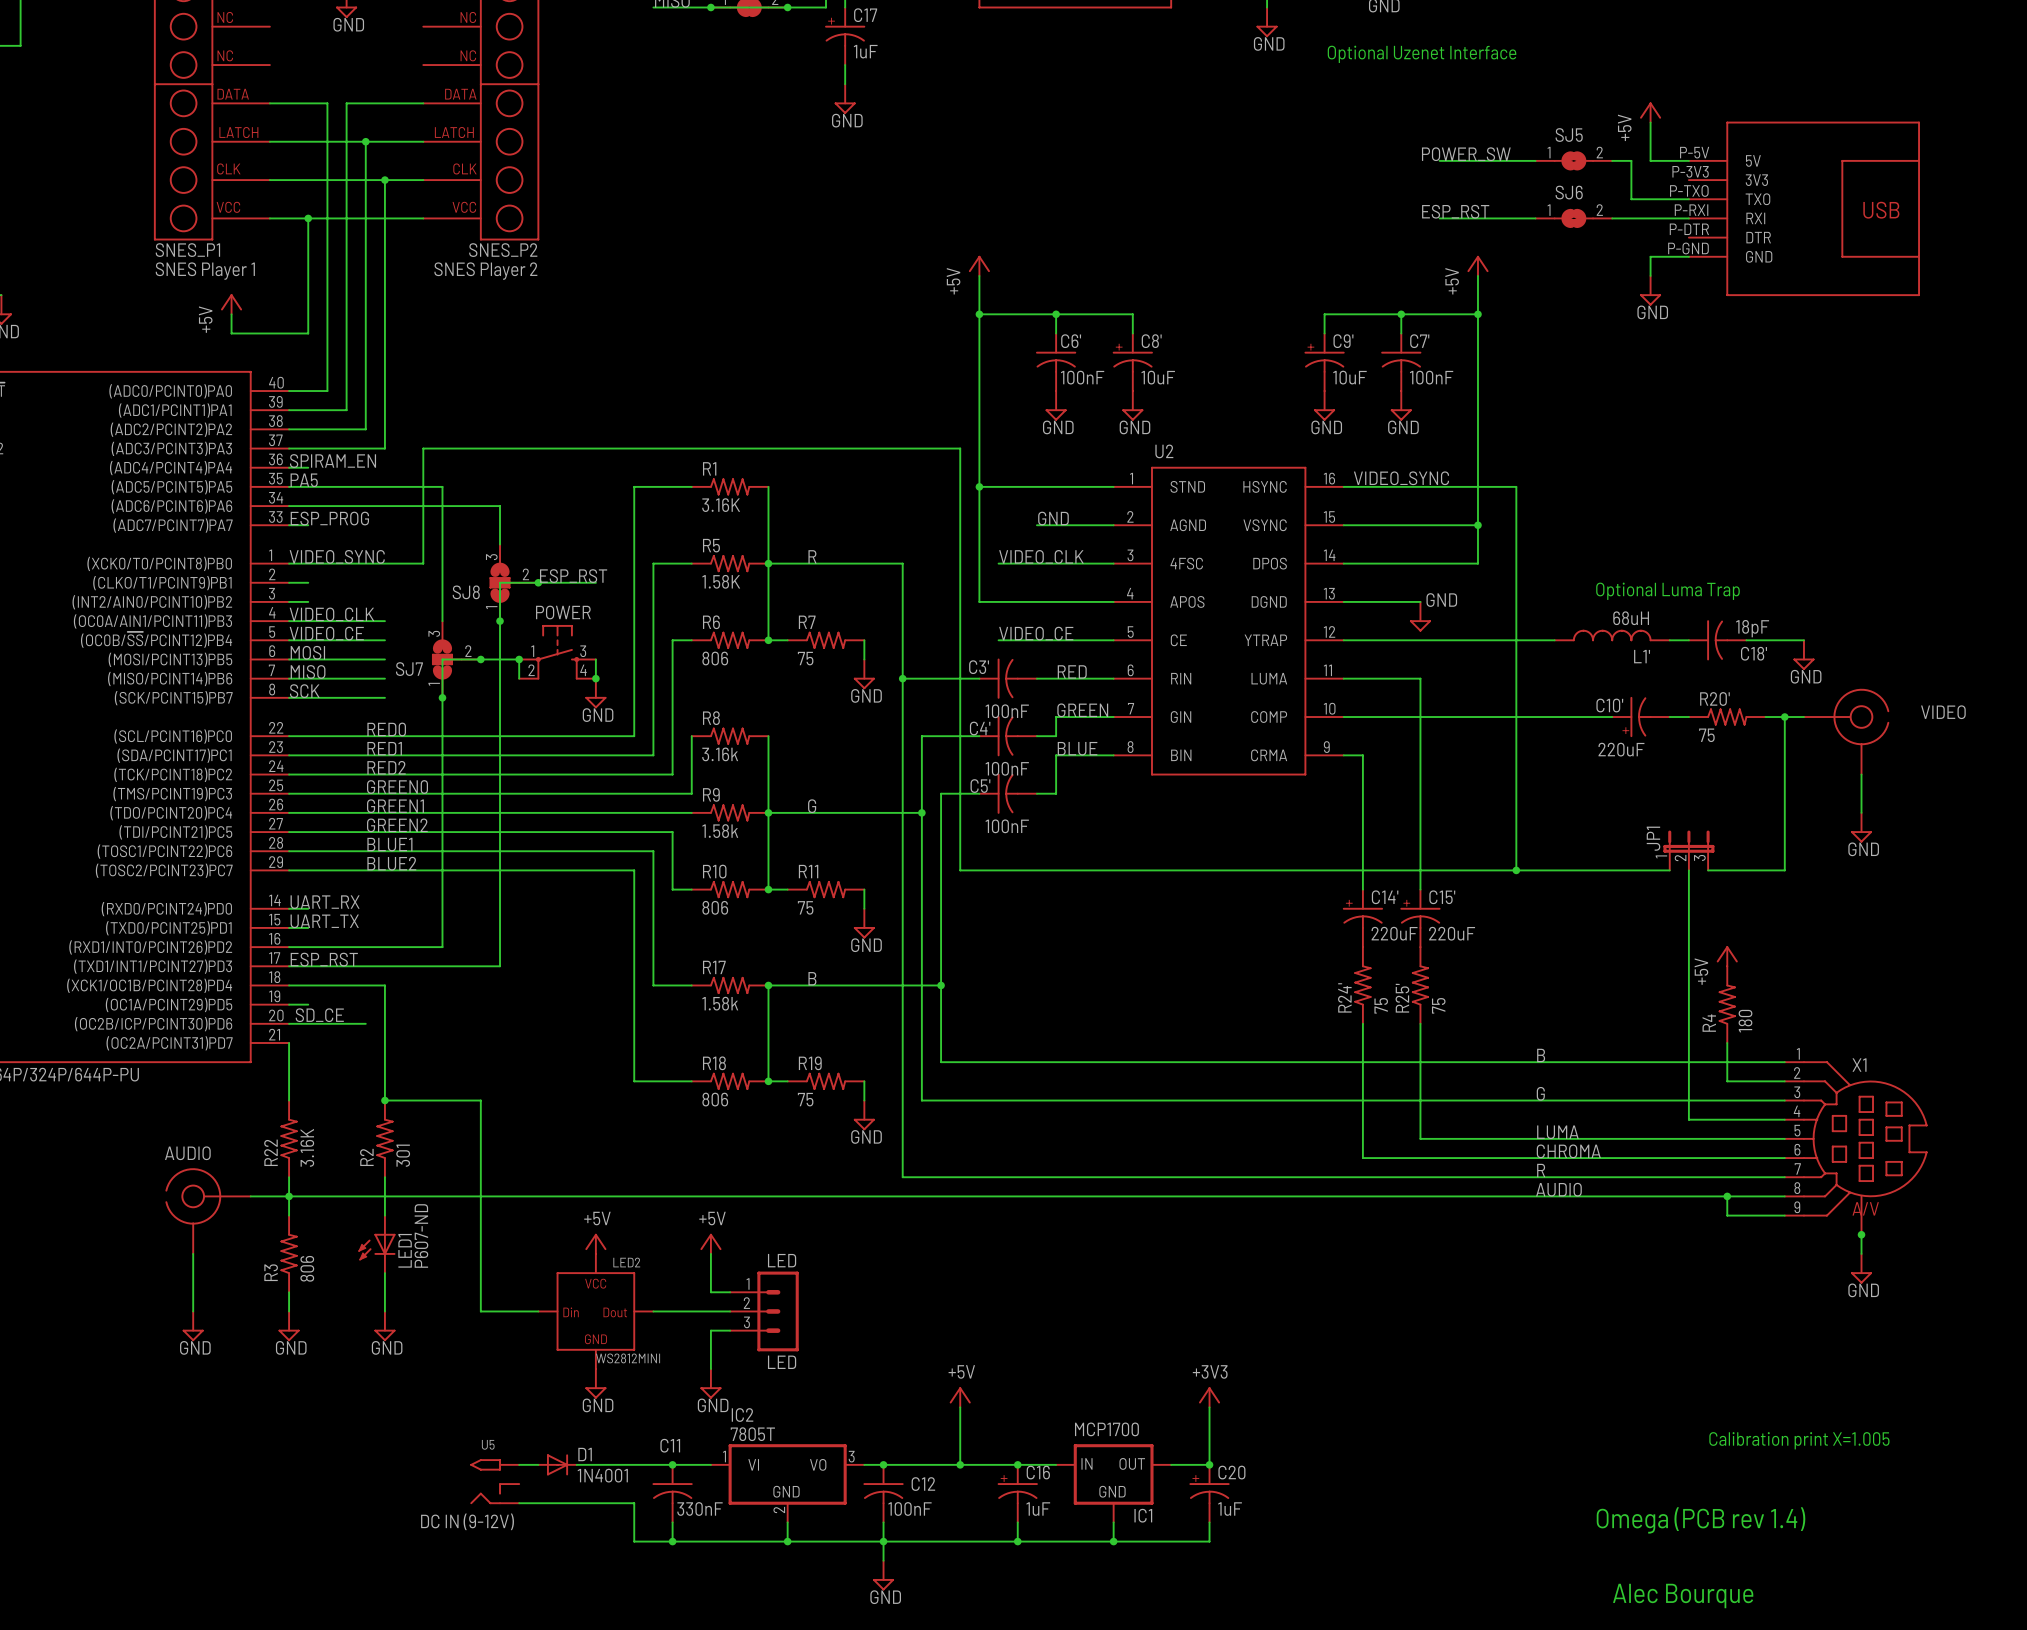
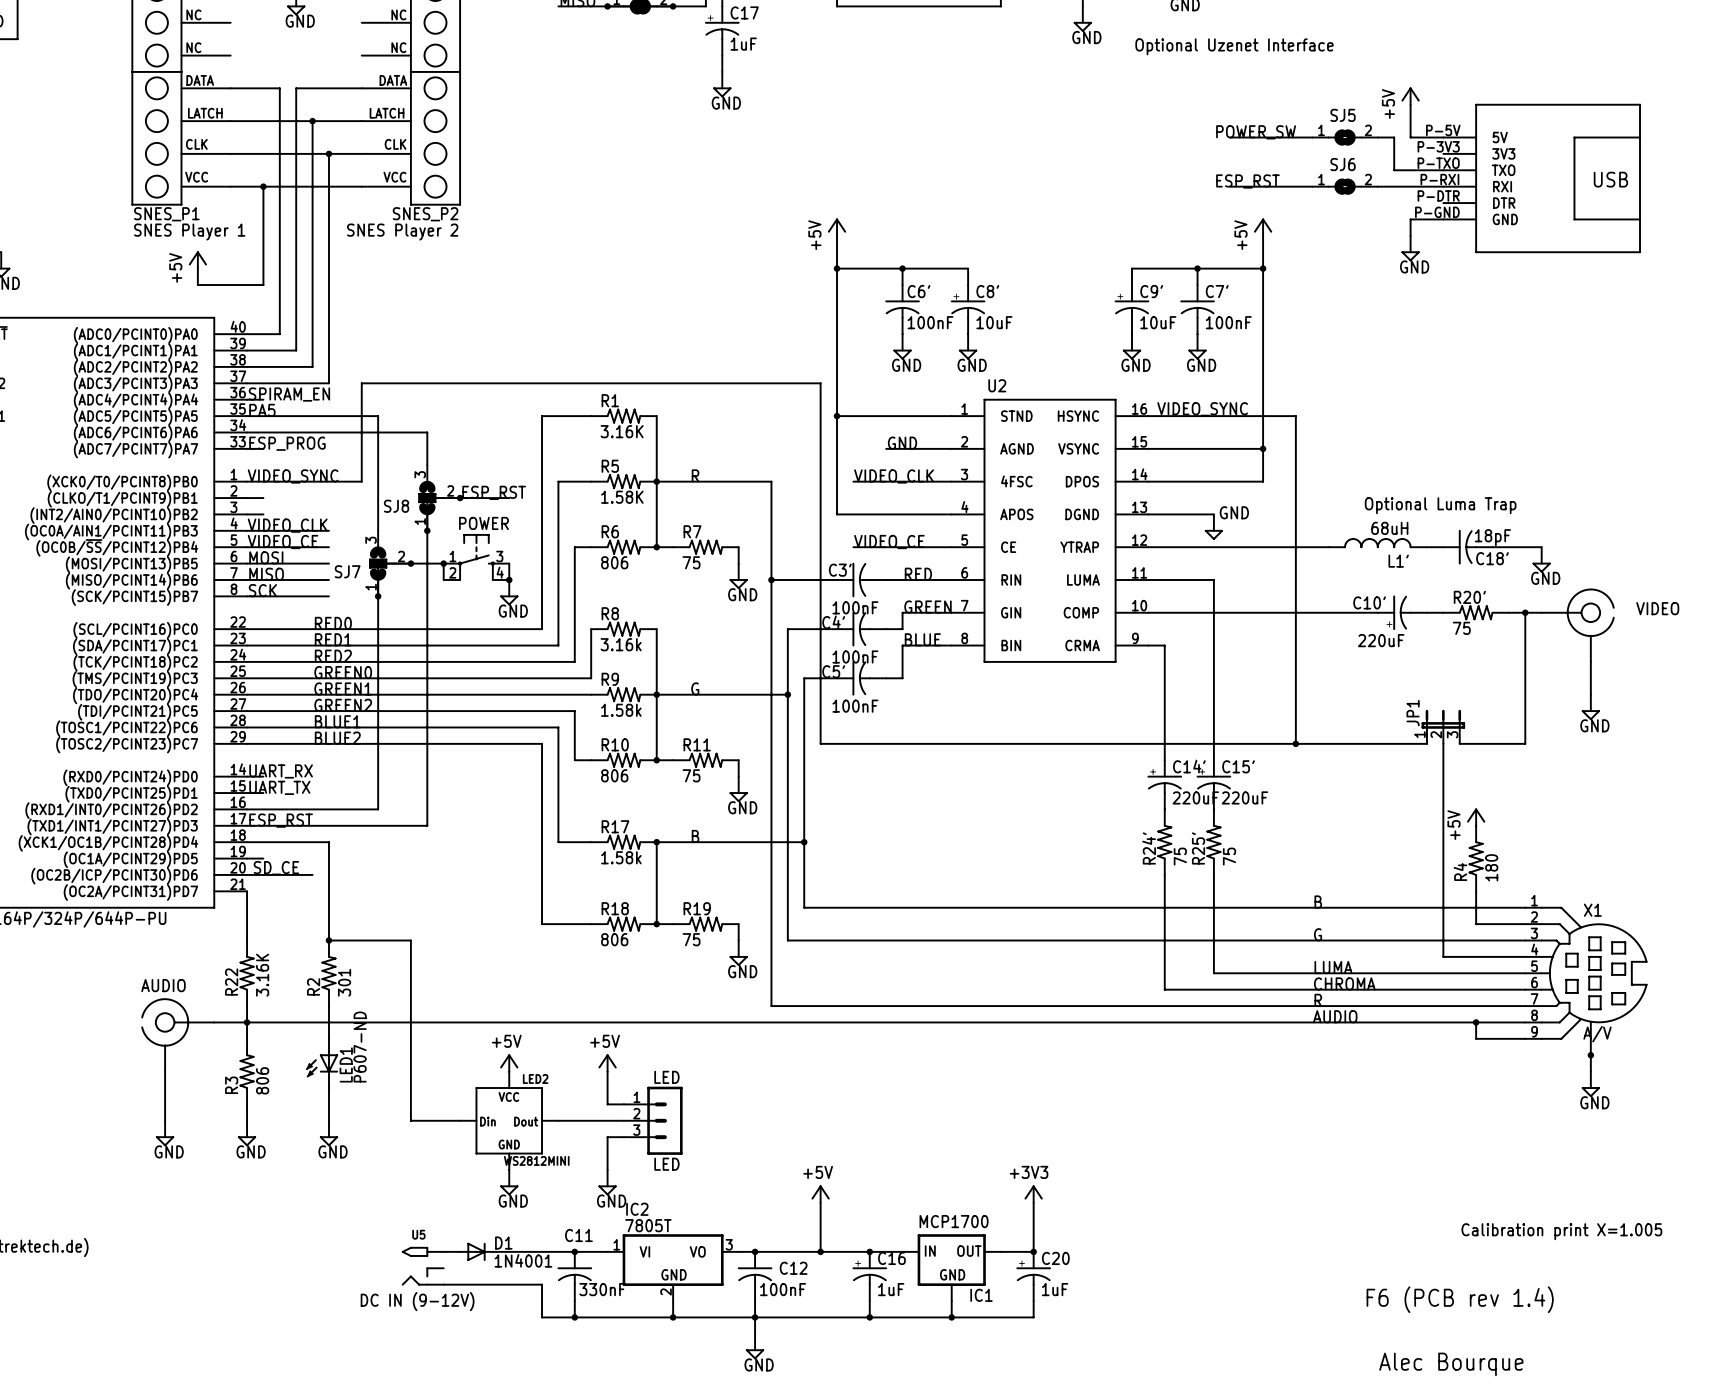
text: Omega (PCB rev 1.4) (1701, 1520) -> F6 (PCB rev 1.4) (1460, 1299)

